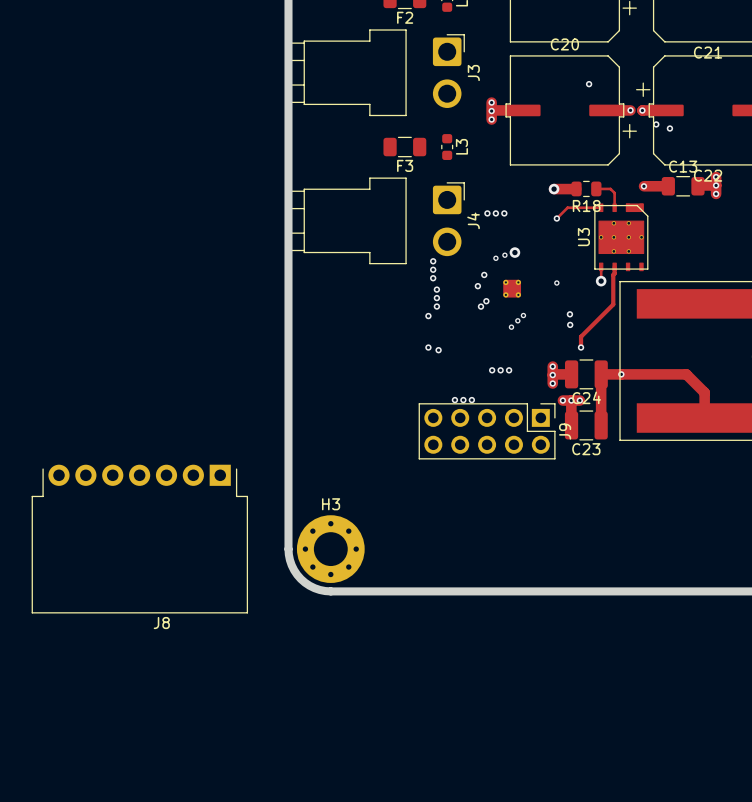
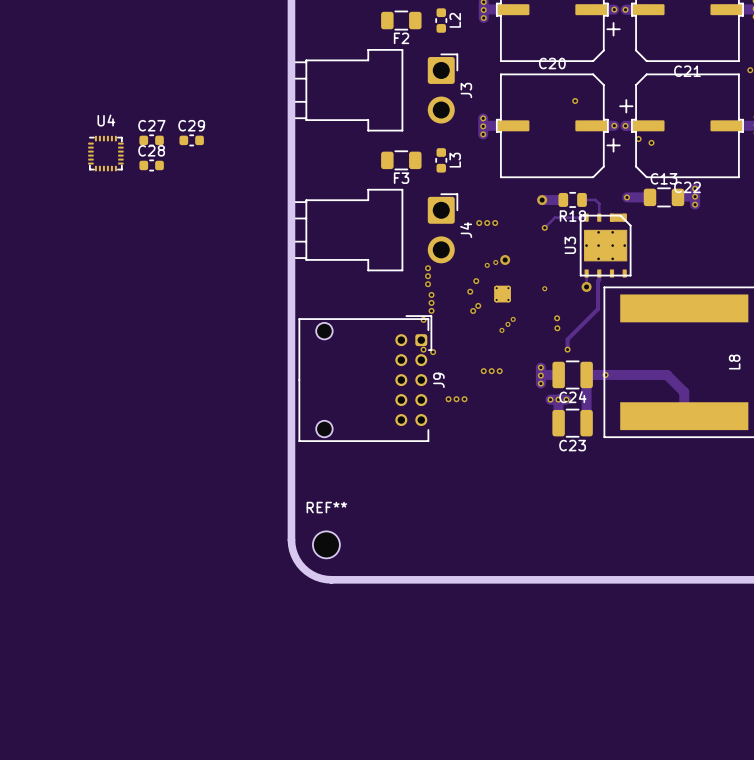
C27: none -> (151, 140)
C29: none -> (191, 140)
U4: none -> (105, 153)
C28: none -> (151, 165)
J9 footprint: [418, 403, 556, 460] -> [298, 315, 432, 442]
J8: (139, 539) -> none
H3: (330, 549) -> none
REF**: none -> (326, 544)

